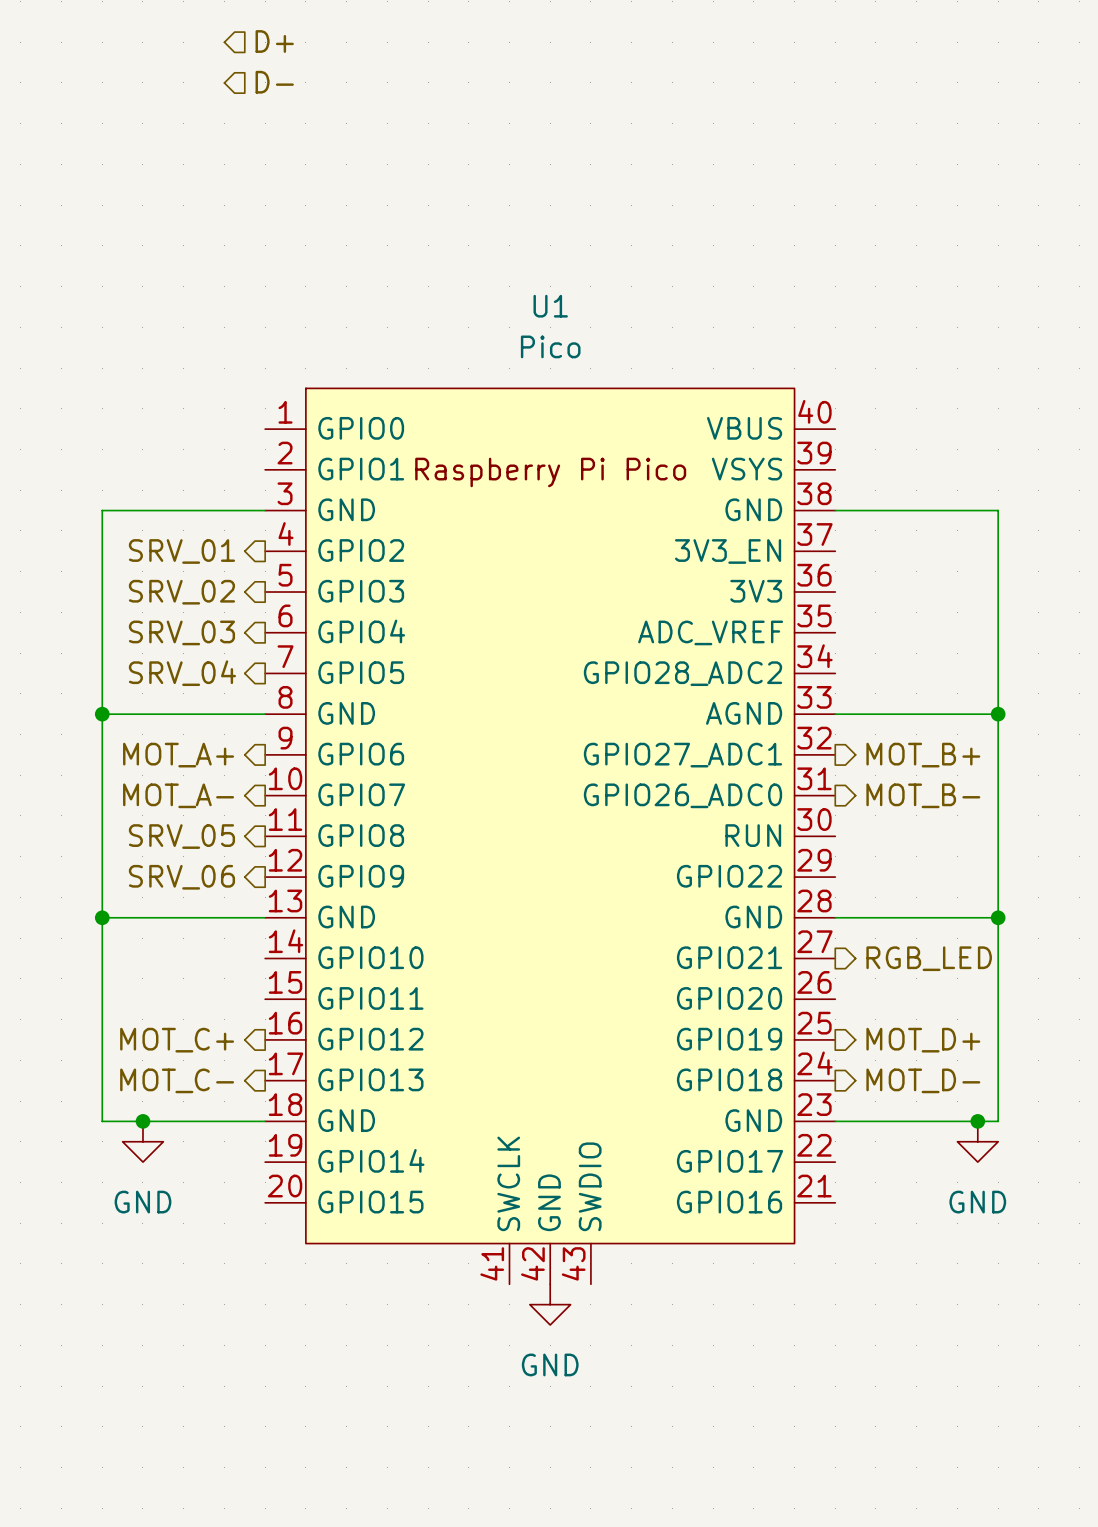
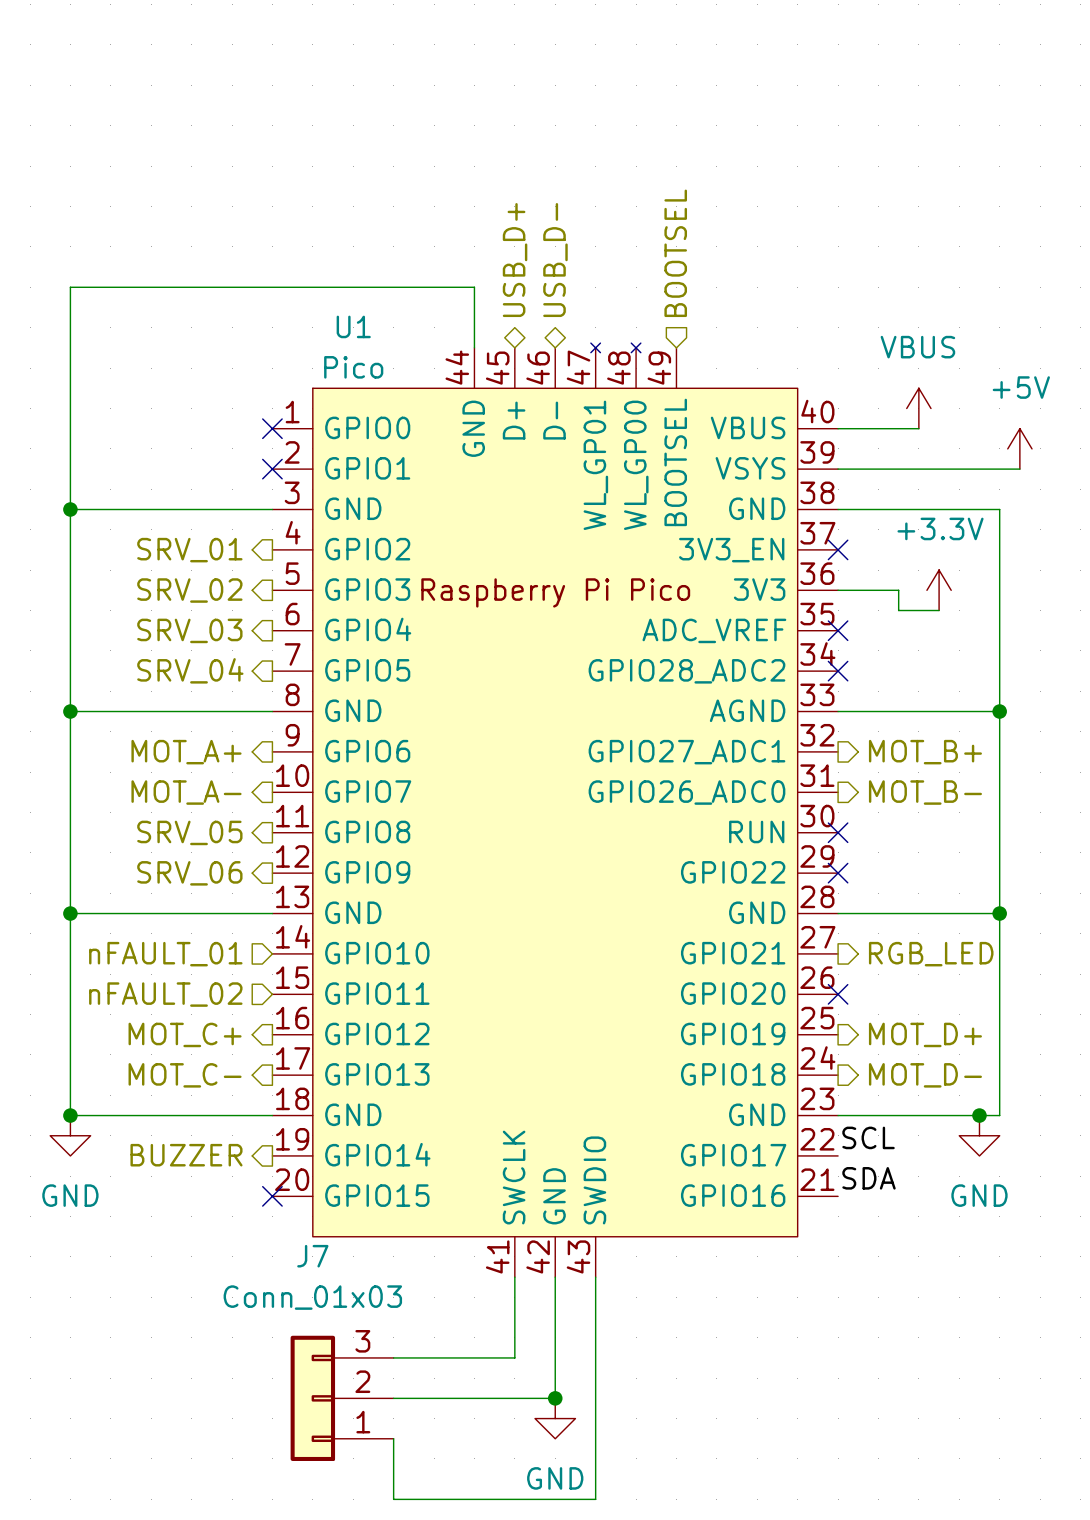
hierarchical label: D+ (274, 41) -> none
hierarchical label: D- (274, 82) -> none
hierarchical label: none -> BOOTSEL (675, 253)
hierarchical label: none -> USB_D+ (515, 260)
hierarchical label: none -> USB_D- (555, 260)
U1 name position: U1 (550, 306) -> U1 (353, 326)
U1 value position: Pico (550, 346) -> Pico (353, 367)
U1 symbol: [265, 388, 836, 1285] -> [272, 343, 839, 1278]
power symbol: none -> VBUS (918, 408)
no-connect mark: none -> (272, 428)
wire: none -> (838, 428) (918, 428)
power symbol: none -> +5V (1019, 448)
no-connect mark: none -> (272, 469)
wire: none -> (838, 469) (1019, 469)
wire: none -> (70, 509) (110, 509)
junction: none -> (70, 509)
wire: (102, 510) (102, 1121) -> (474, 347) (474, 287) (70, 287) (70, 1115) (110, 1115)
no-connect mark: none -> (838, 549)
wire: none -> (838, 590) (898, 590) (898, 610) (939, 610)
power symbol: none -> +3.3V (939, 590)
no-connect mark: none -> (838, 630)
no-connect mark: none -> (838, 671)
wire: none -> (70, 711) (110, 711)
junction position: (102, 714) -> (70, 711)
no-connect mark: none -> (838, 832)
no-connect mark: none -> (838, 873)
wire: none -> (70, 913) (110, 913)
junction position: (102, 917) -> (70, 913)
hierarchical label: none -> nFAULT_01 (165, 954)
hierarchical label: none -> nFAULT_02 (165, 994)
no-connect mark: none -> (838, 994)
junction position: (142, 1121) -> (70, 1115)
power symbol position: GND (142, 1141) -> GND (70, 1135)
label: none -> SCL (868, 1137)
hierarchical label: none -> BUZZER (186, 1155)
label: none -> SDA (869, 1178)
no-connect mark: none -> (272, 1196)
wire: none -> (514, 1277) (514, 1357) (393, 1357)
wire: none -> (555, 1277) (555, 1398) (393, 1398)
wire: none -> (595, 1277) (595, 1499) (393, 1499) (393, 1438)
power symbol position: GND (550, 1304) -> GND (555, 1418)
J7: none -> Conn_01x03 (342, 1398)
junction: none -> (555, 1398)

